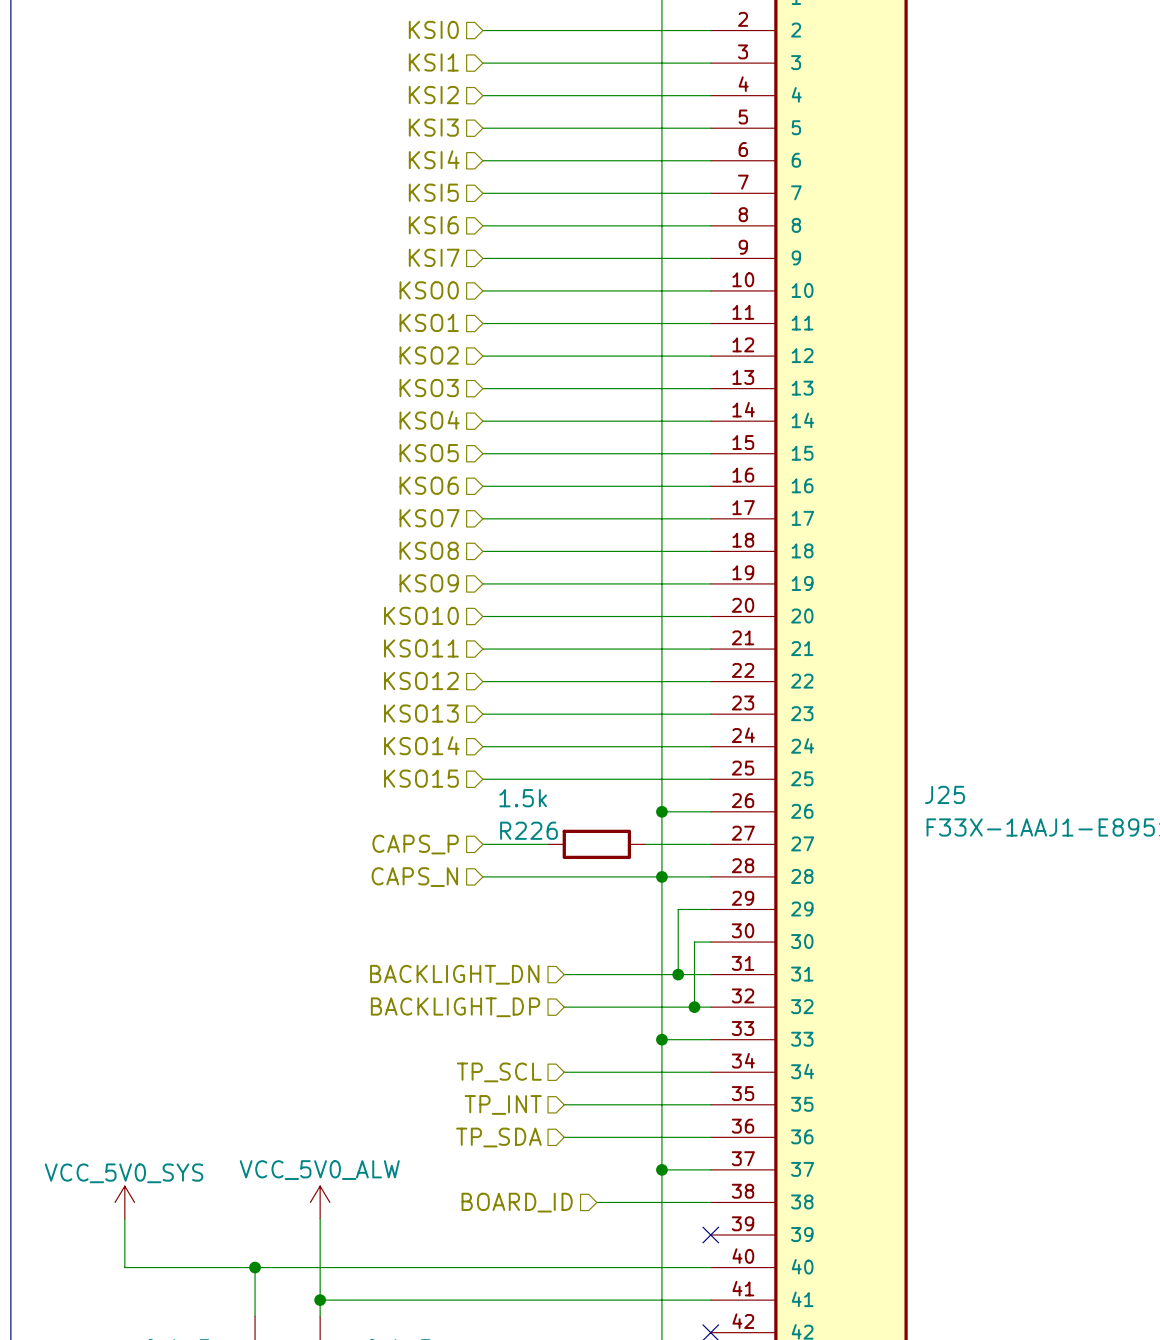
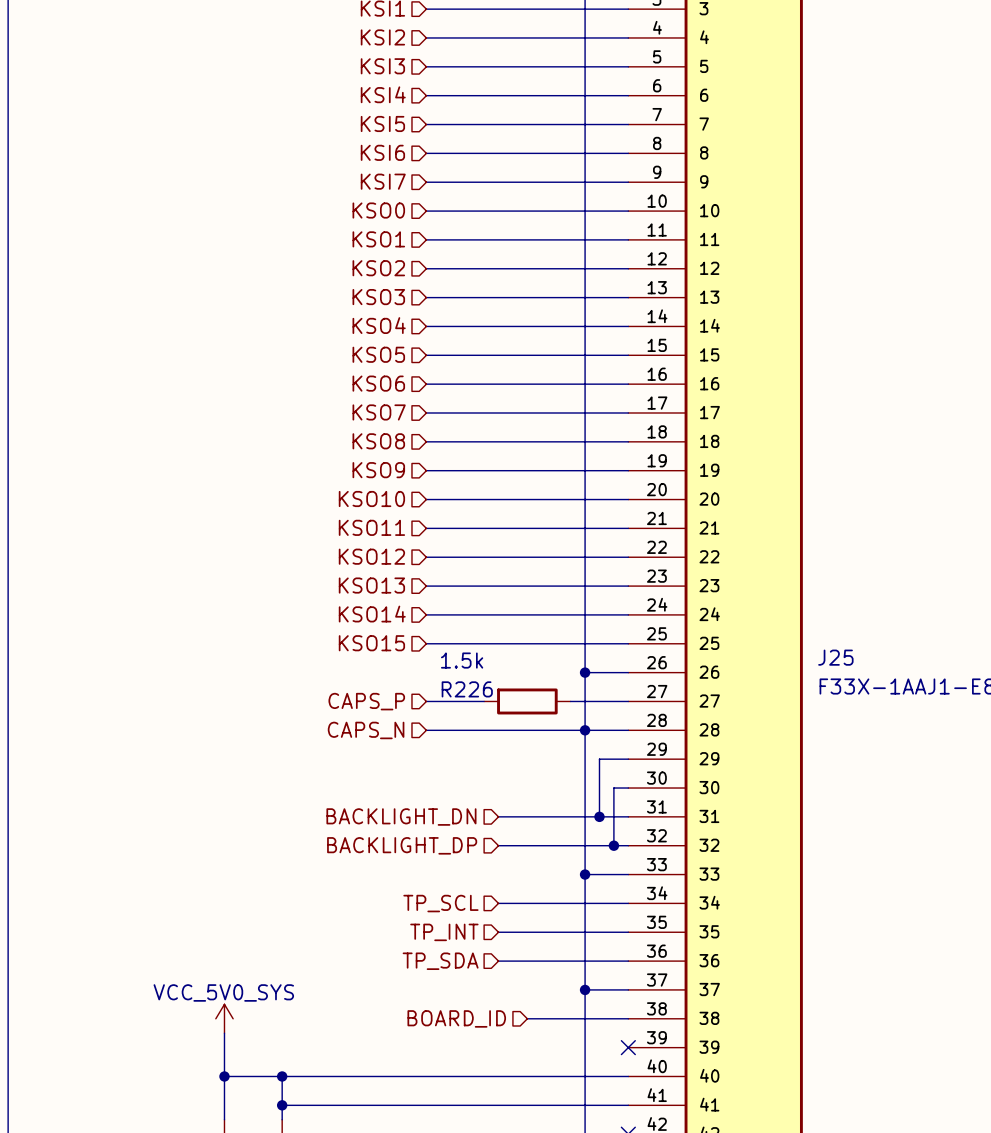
power symbol position: VCC_5V0_SYS (124, 1202) -> VCC_5V0_SYS (224, 1018)
power symbol: VCC_5V0_ALW (320, 1202) -> none
wire: (124, 1218) (124, 1267) (255, 1267) -> (224, 1033) (224, 1076)
wire: (320, 1218) (320, 1267) -> none
junction: none -> (282, 1076)

